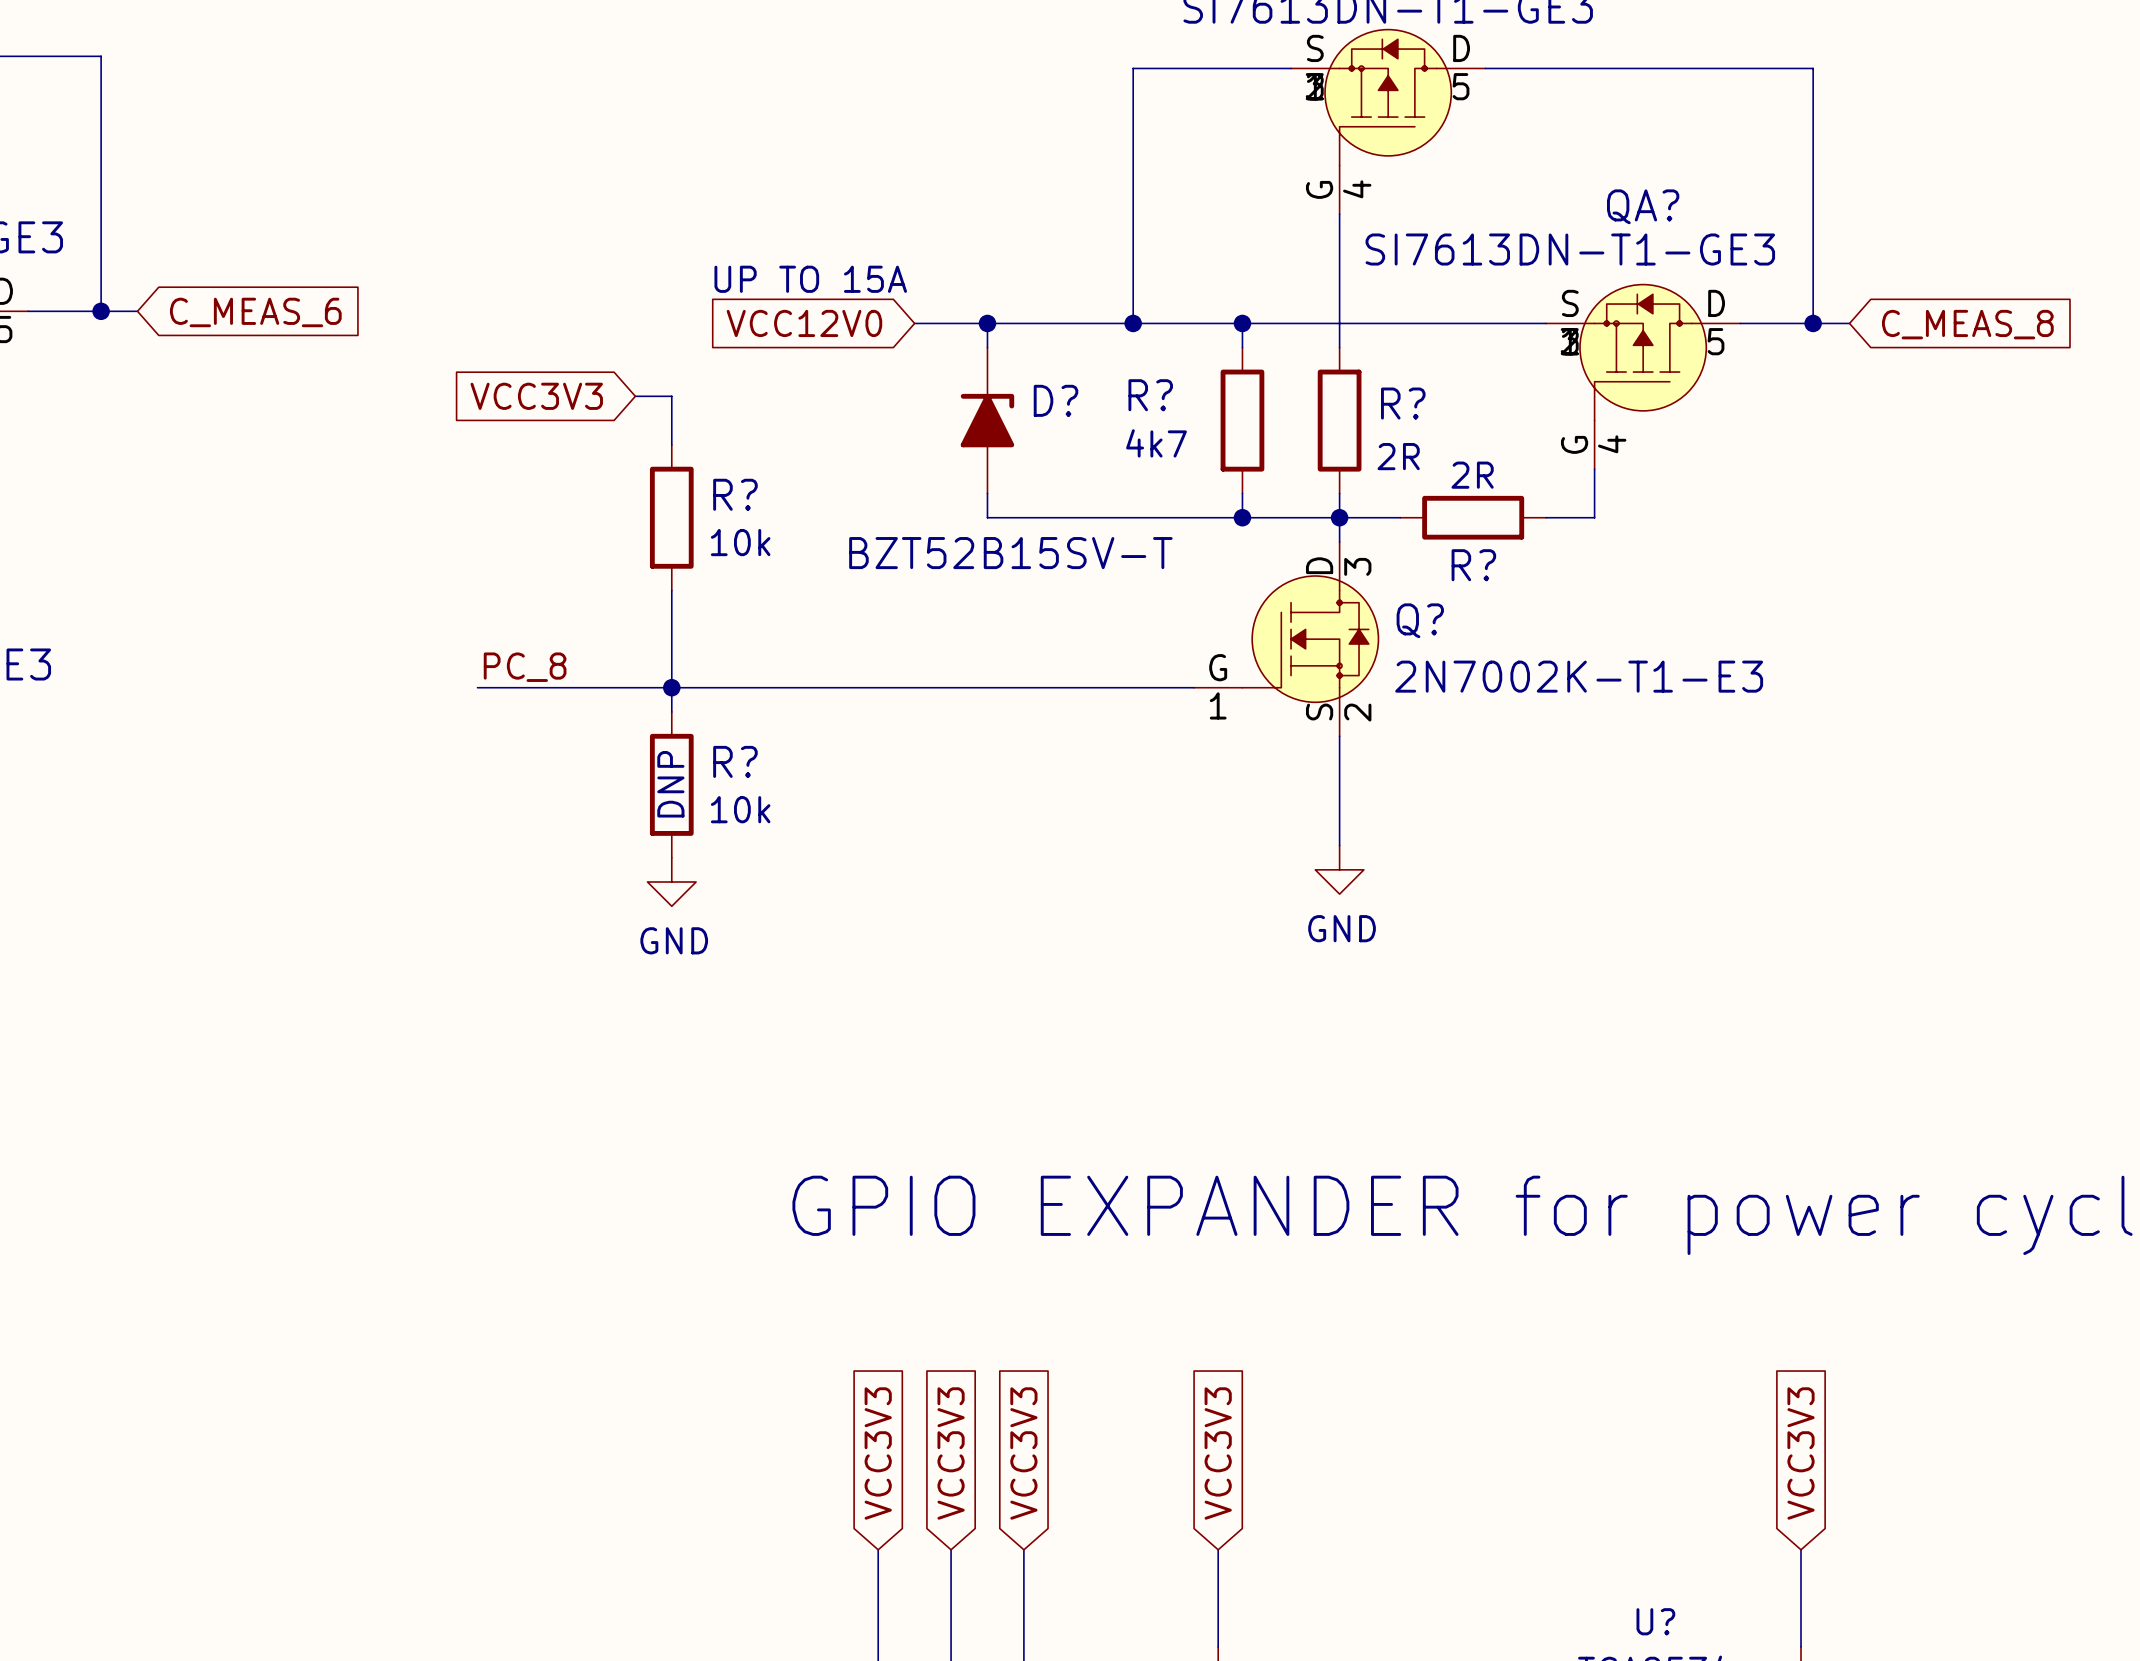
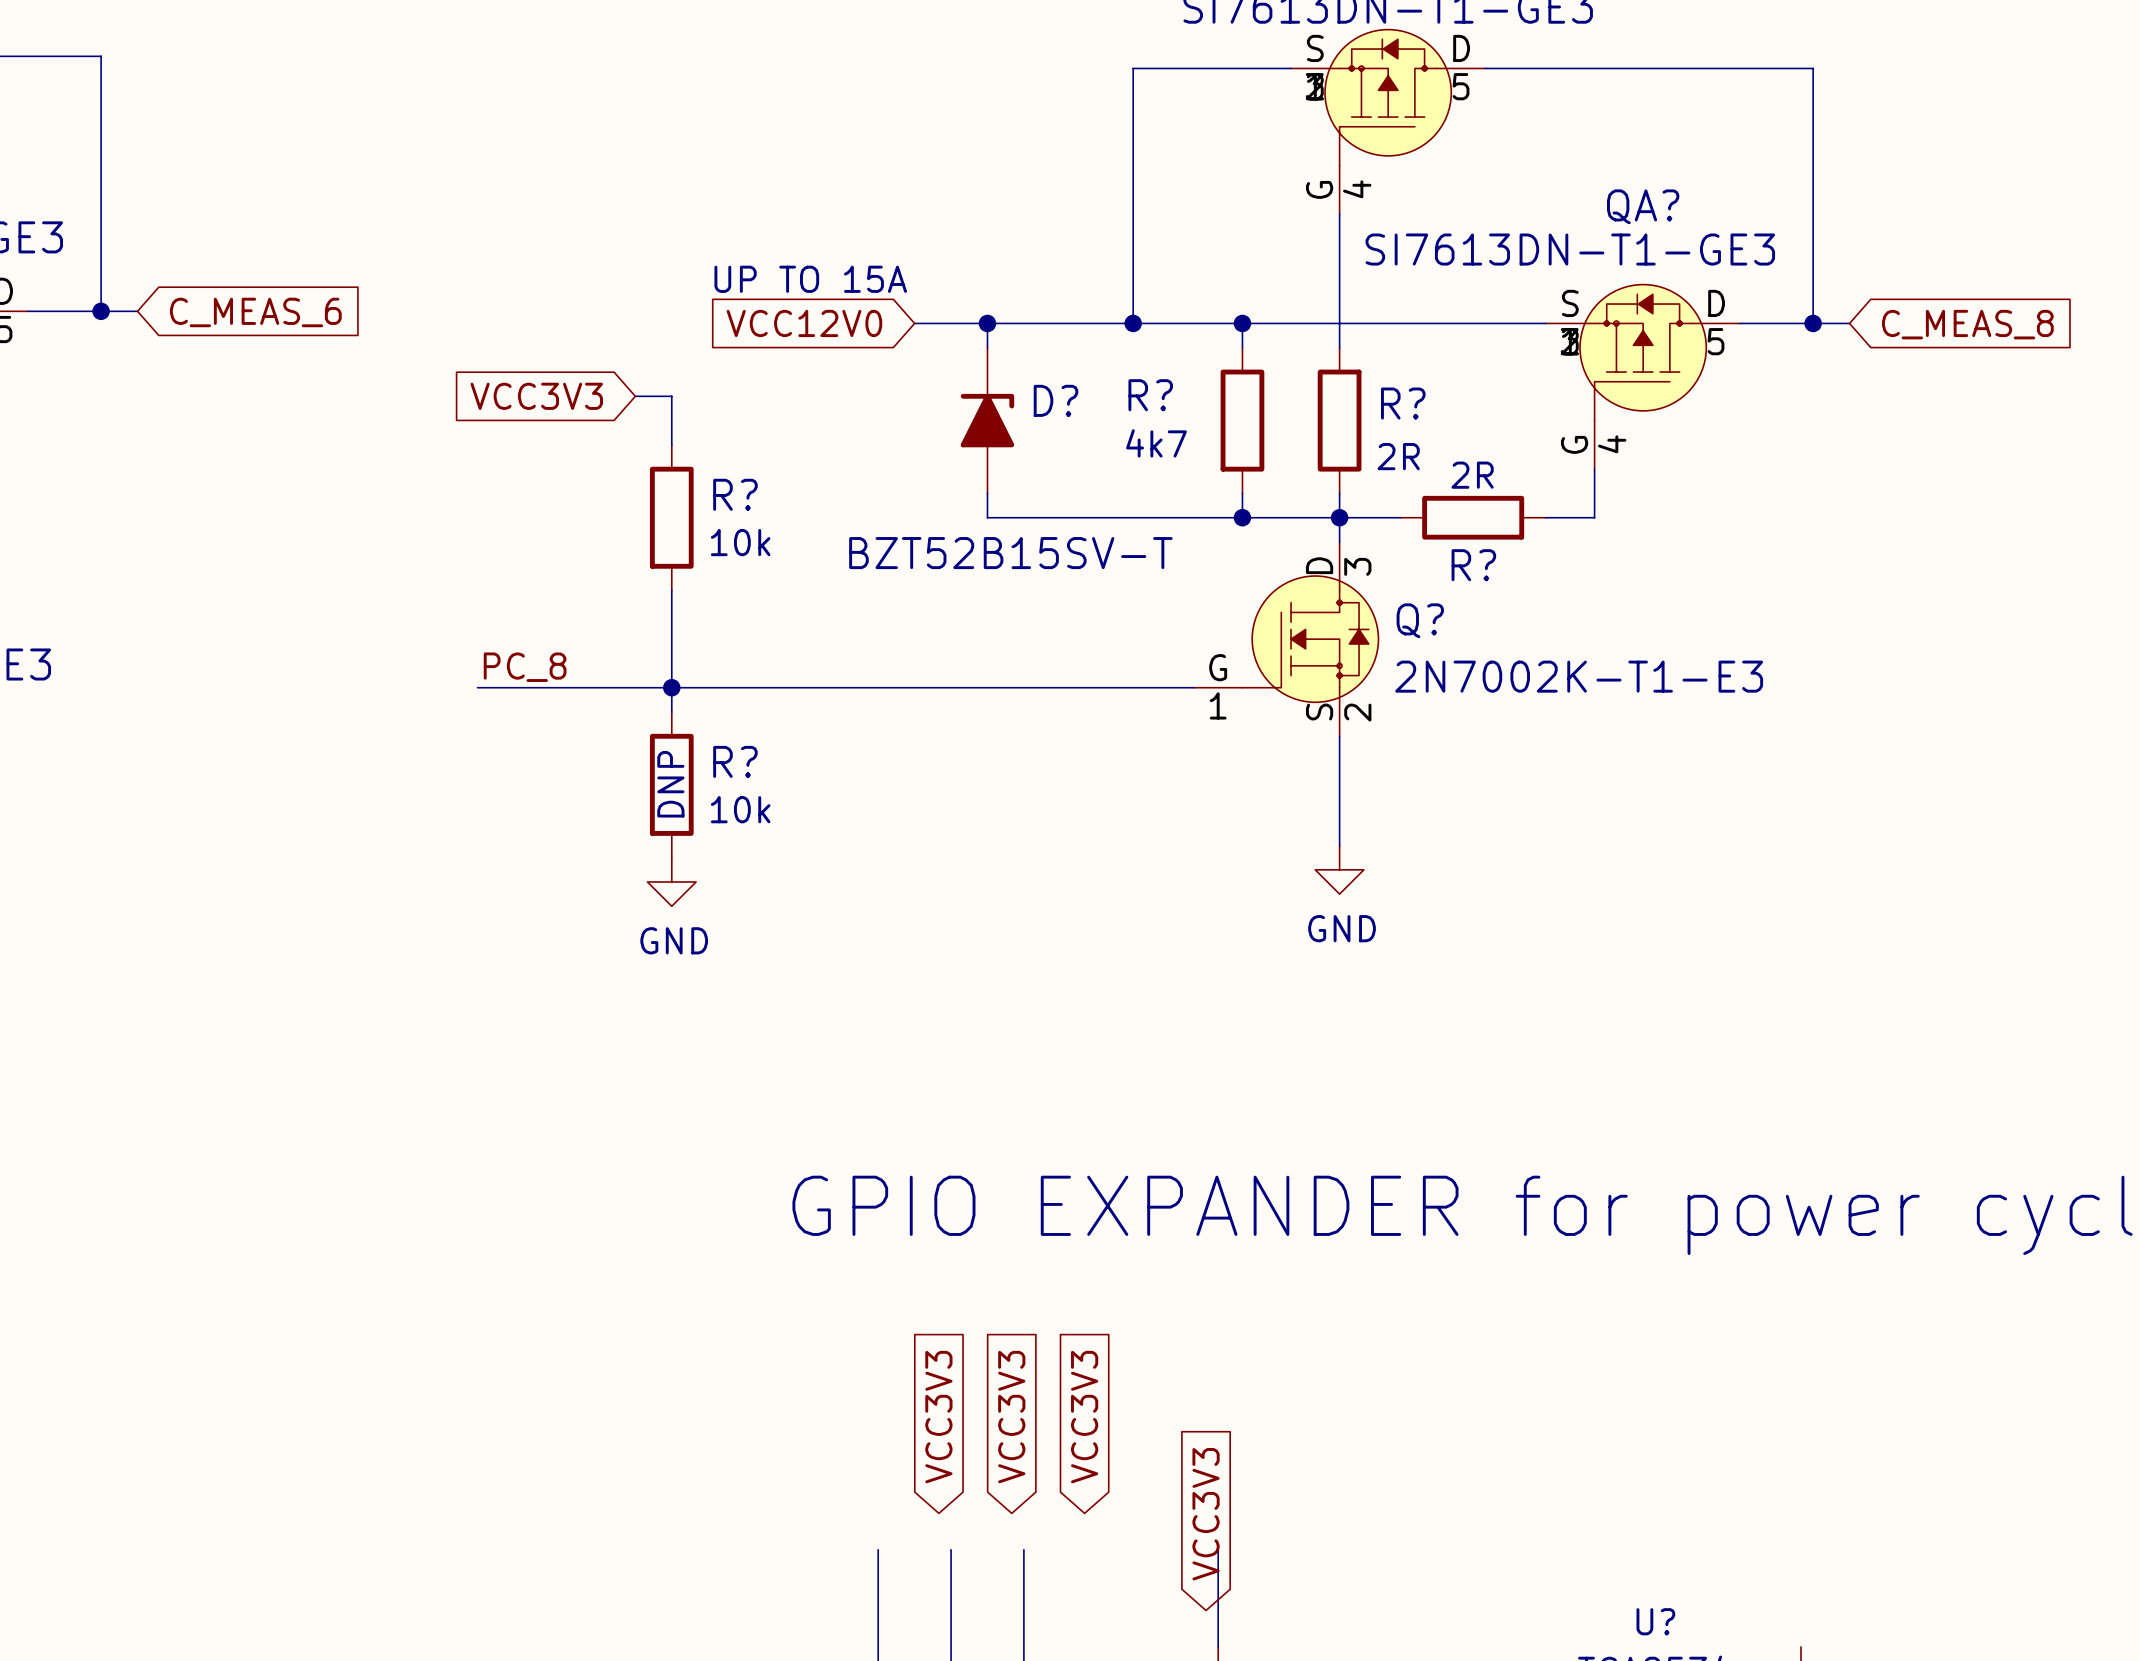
global label: none -> VCC3V3 (1084, 1417)
global label: VCC3V3 (878, 1453) -> none
global label position: VCC3V3 (951, 1453) -> VCC3V3 (938, 1417)
global label position: VCC3V3 (1023, 1453) -> VCC3V3 (1011, 1417)
global label position: VCC3V3 (1218, 1453) -> VCC3V3 (1206, 1514)
global label: VCC3V3 (1801, 1453) -> none
wire: (1801, 1549) (1801, 1646) -> none

